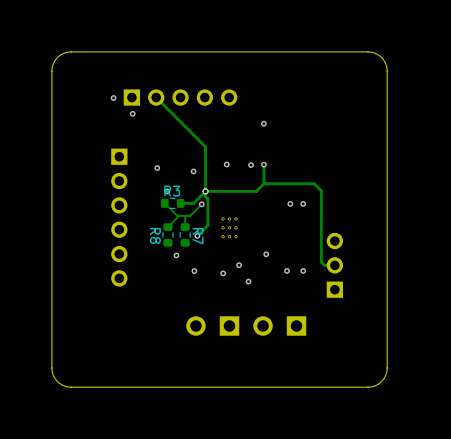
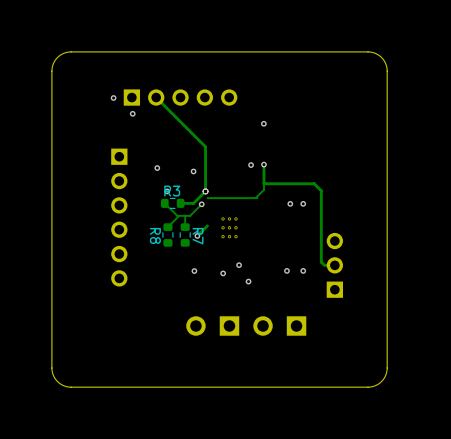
via: (226, 164) -> none
track: (263, 183) (256, 191) (205, 191) (205, 196) (207, 198) (207, 225) -> (263, 183) (263, 189) (255, 198)
track: none -> (257, 198) (207, 198)
via: (266, 254) -> none
via: (176, 255) -> none

